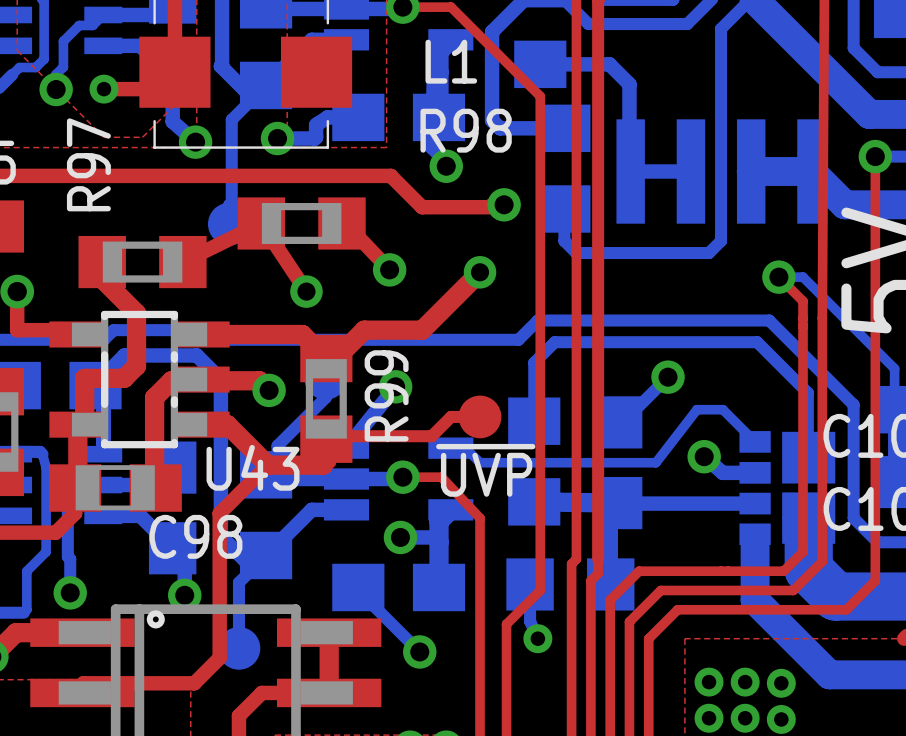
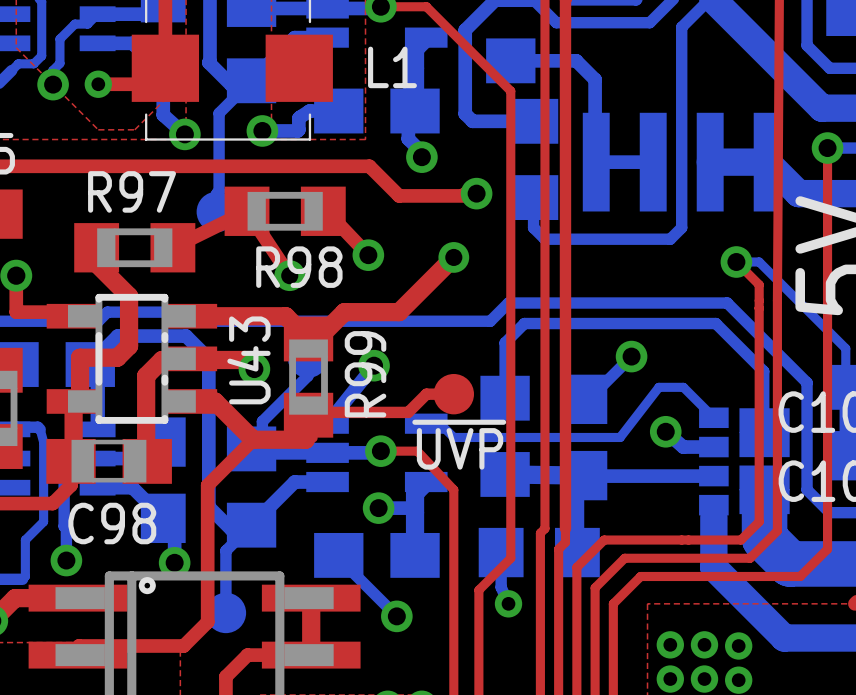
L1 name position: L1 (451, 61) -> L1 (392, 67)
R98 name position: R98 (466, 130) -> R98 (299, 267)
R97 name rotation: 0° (88, 164) -> 90° clockwise (132, 191)
U43 name rotation: 0° (253, 467) -> 90° counterclockwise (248, 360)
C98 name position: C98 (195, 536) -> C98 (112, 523)

